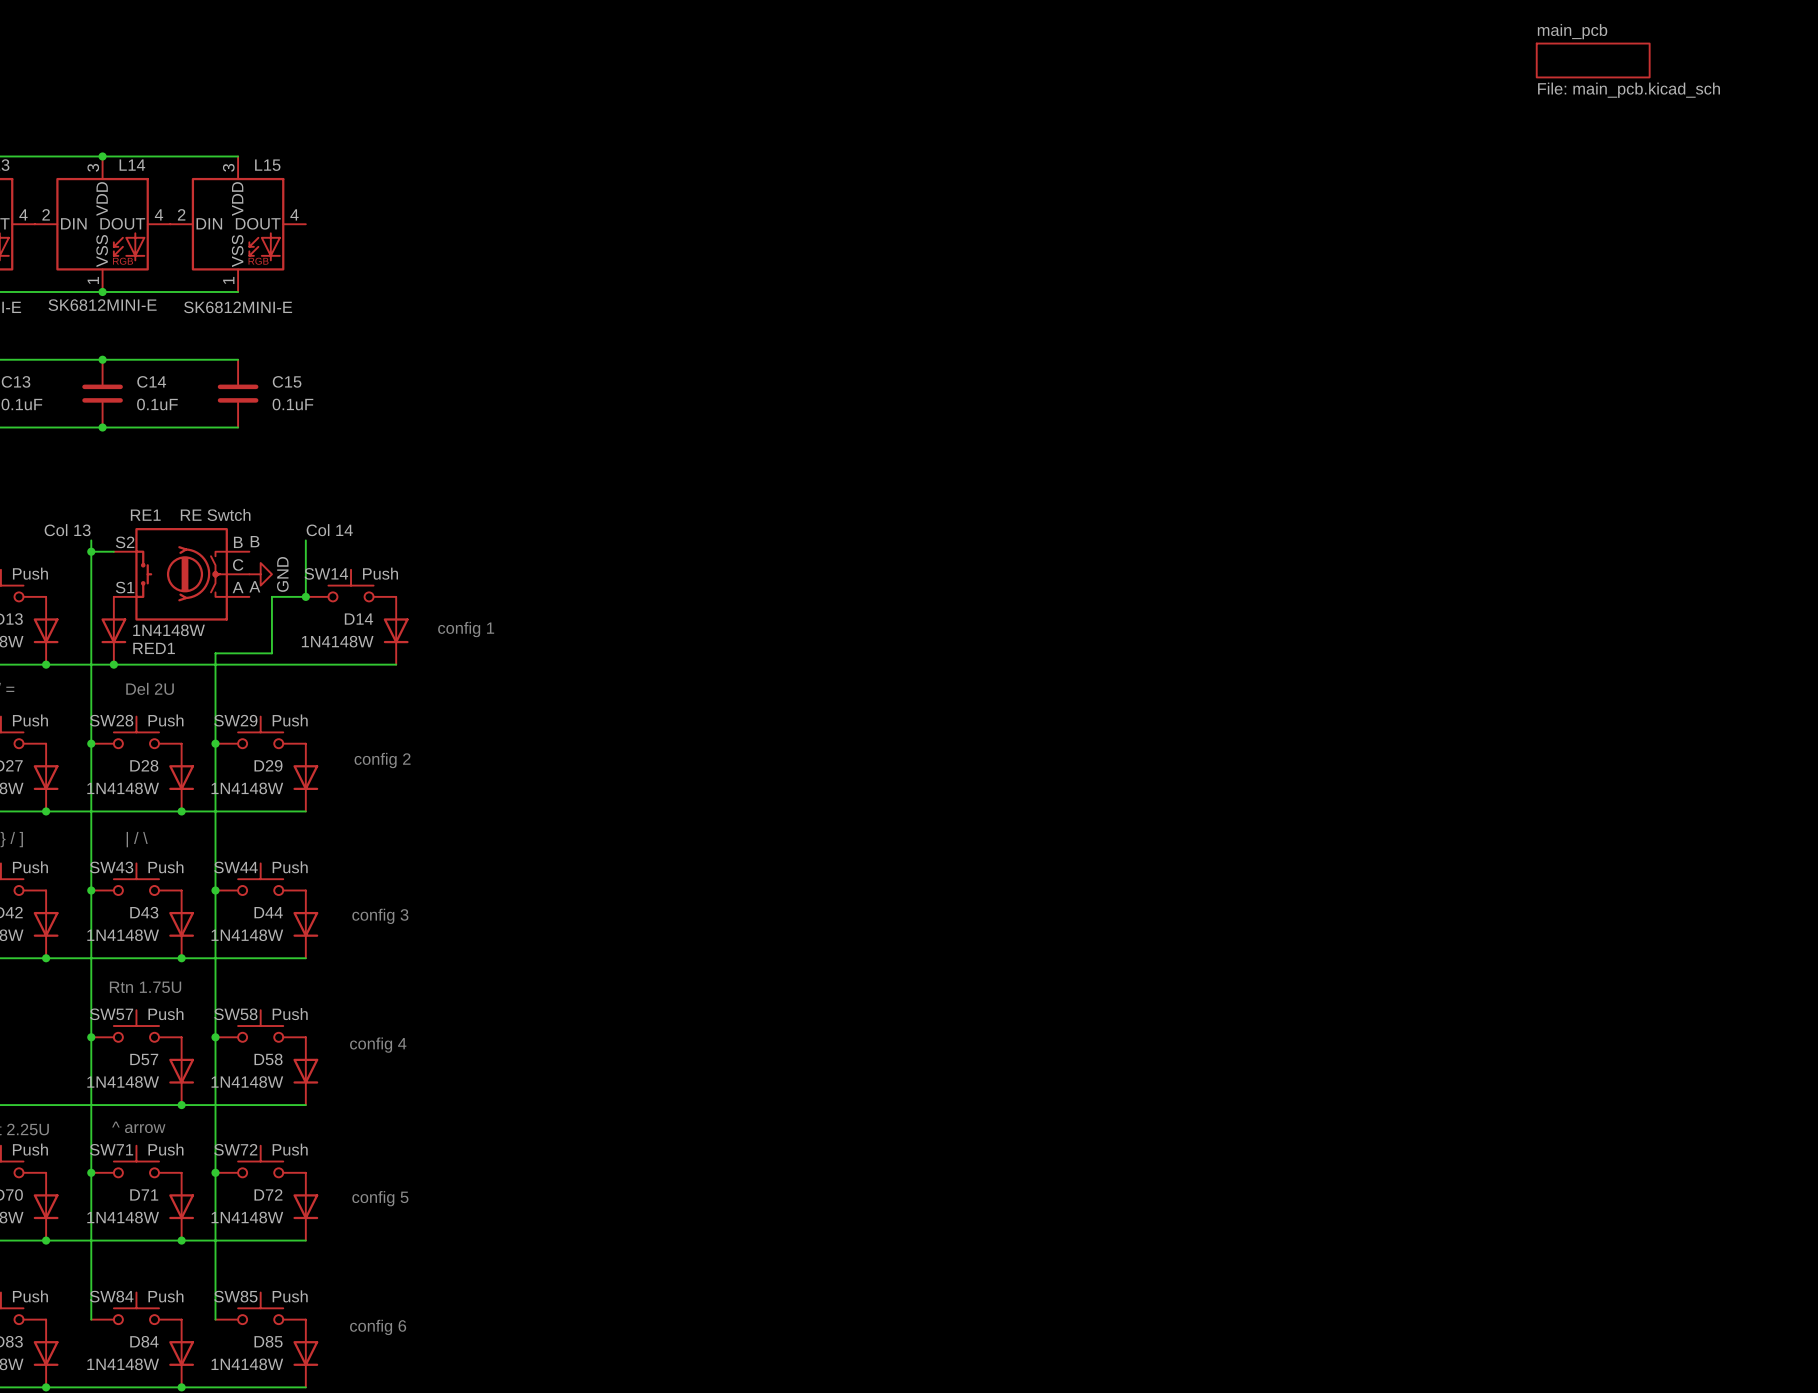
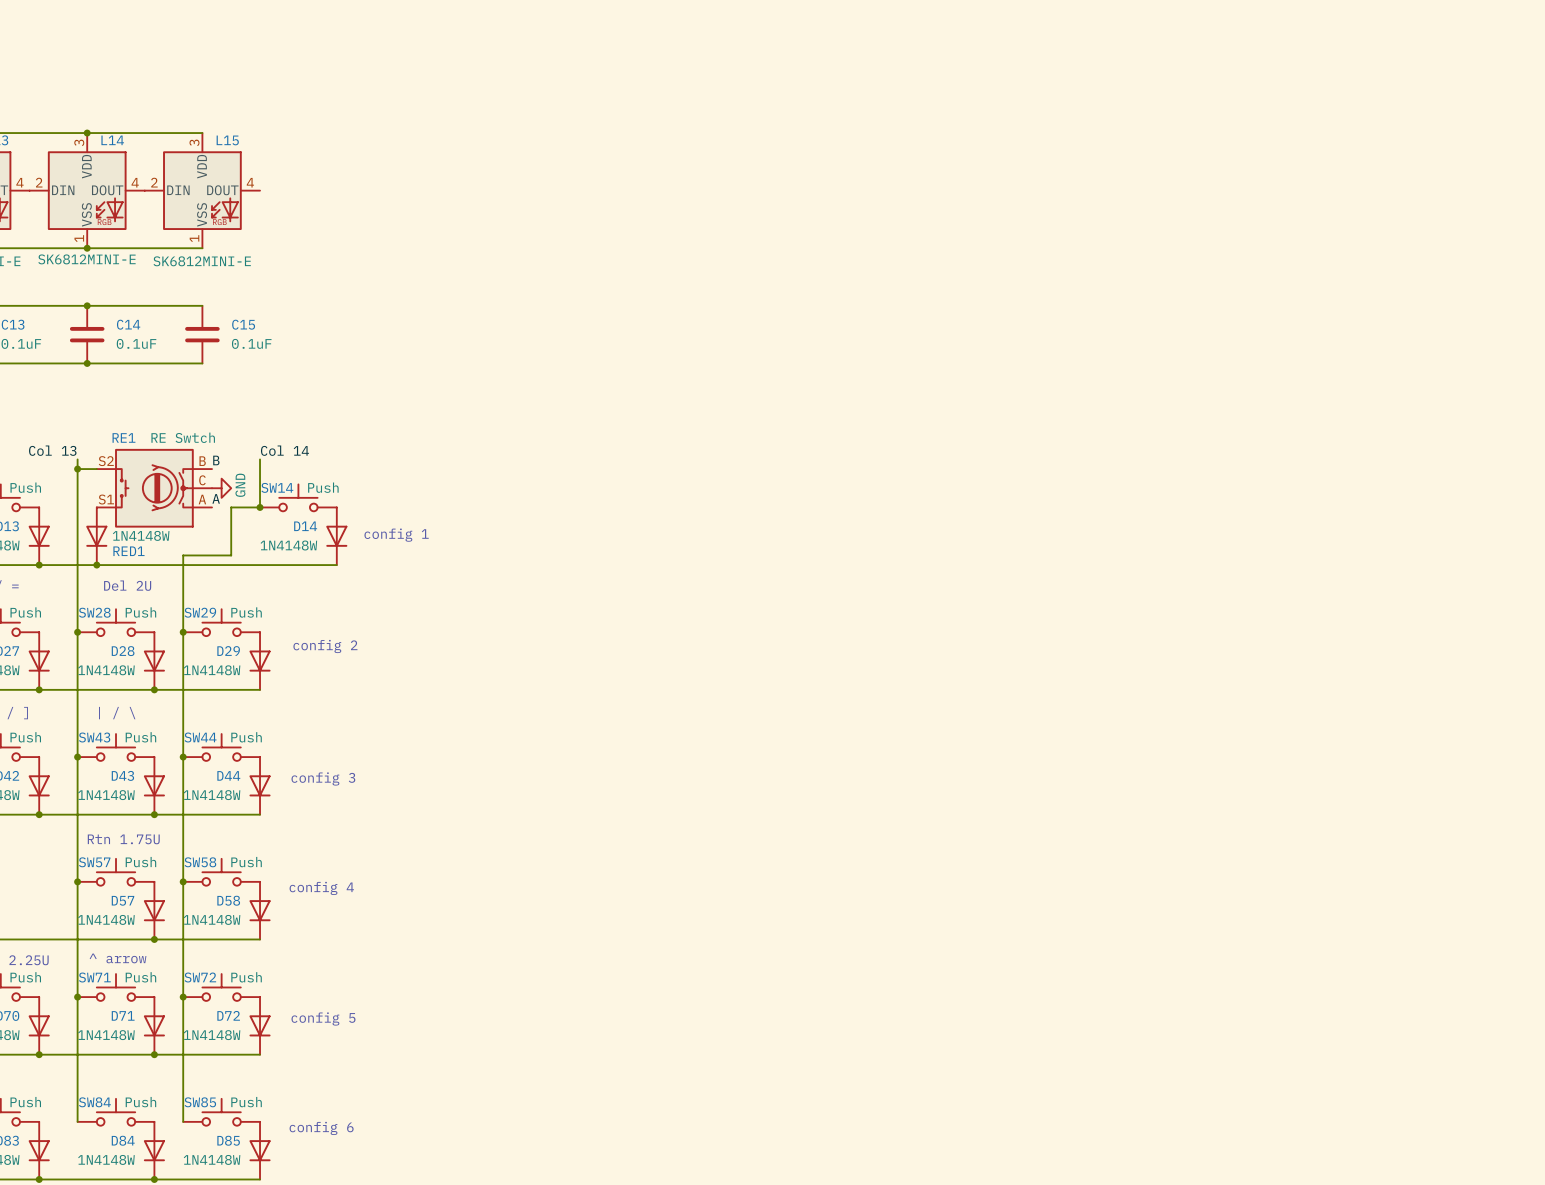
sheet main_pcb: File: main_pcb.kicad_sch (1593, 60) -> none

